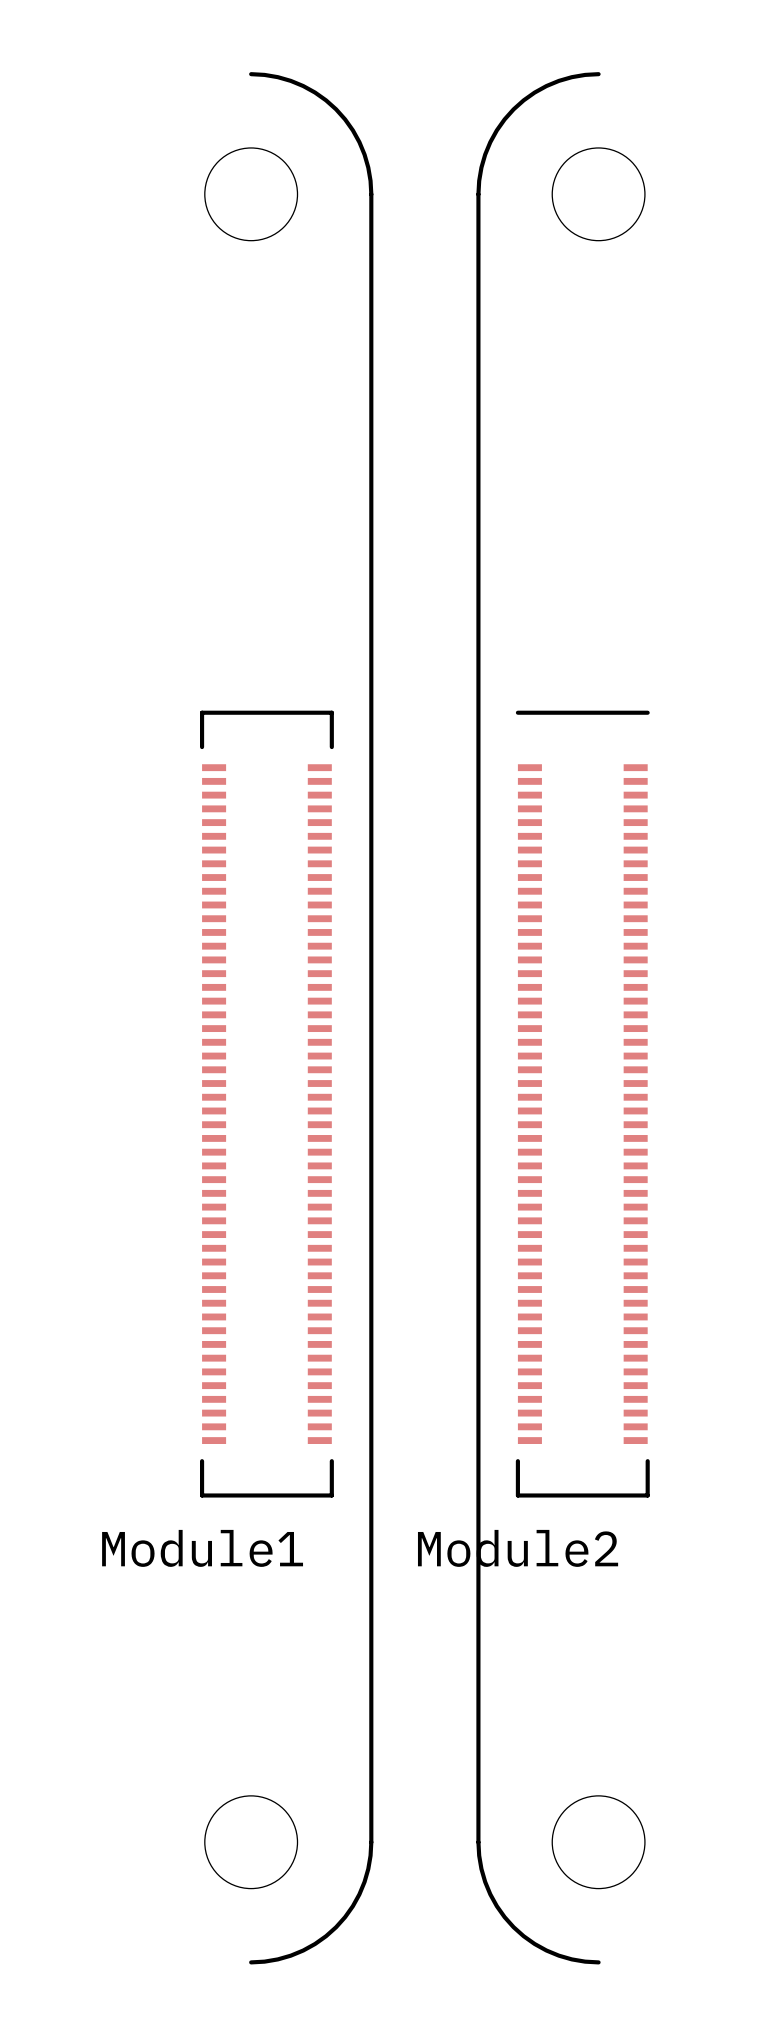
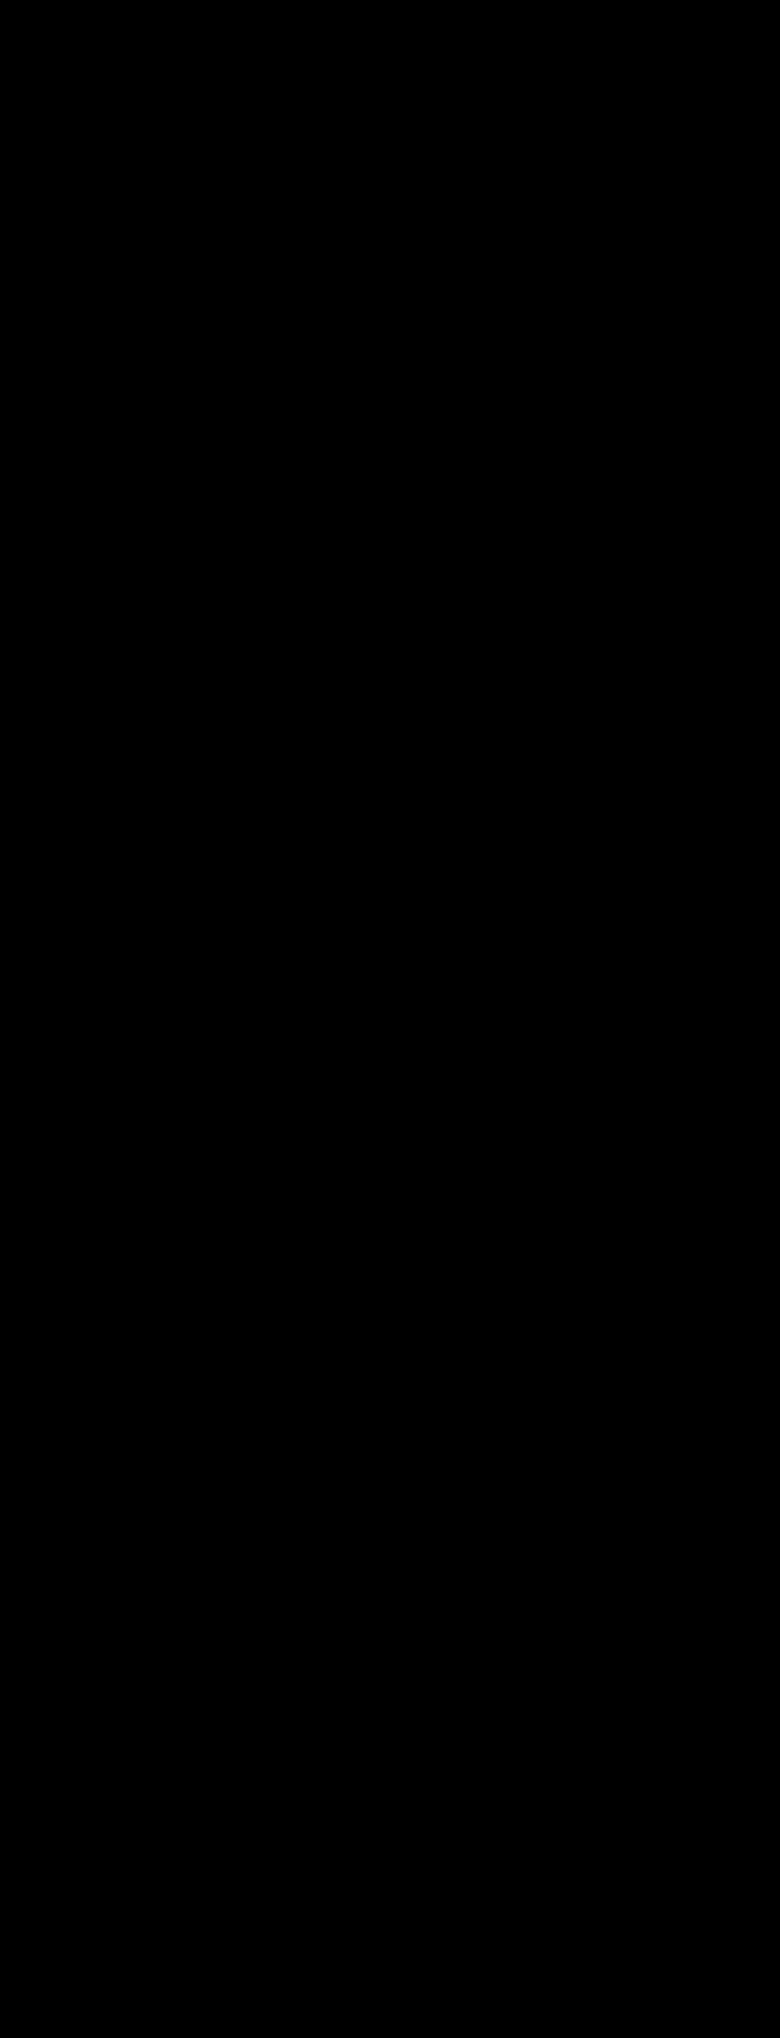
Module1: (286, 1018) -> none
Module2: (563, 1018) -> none

